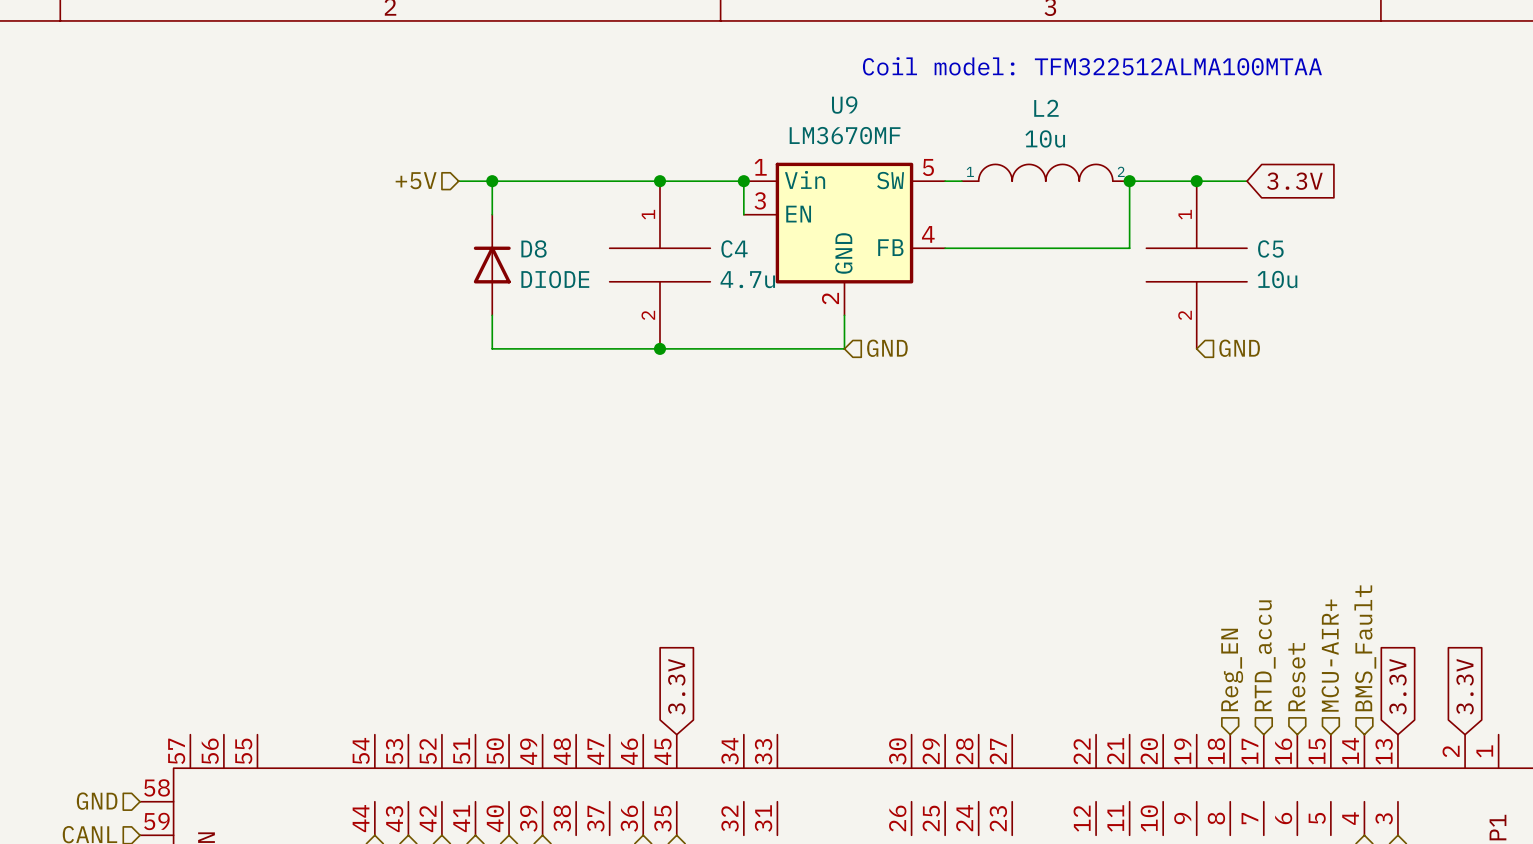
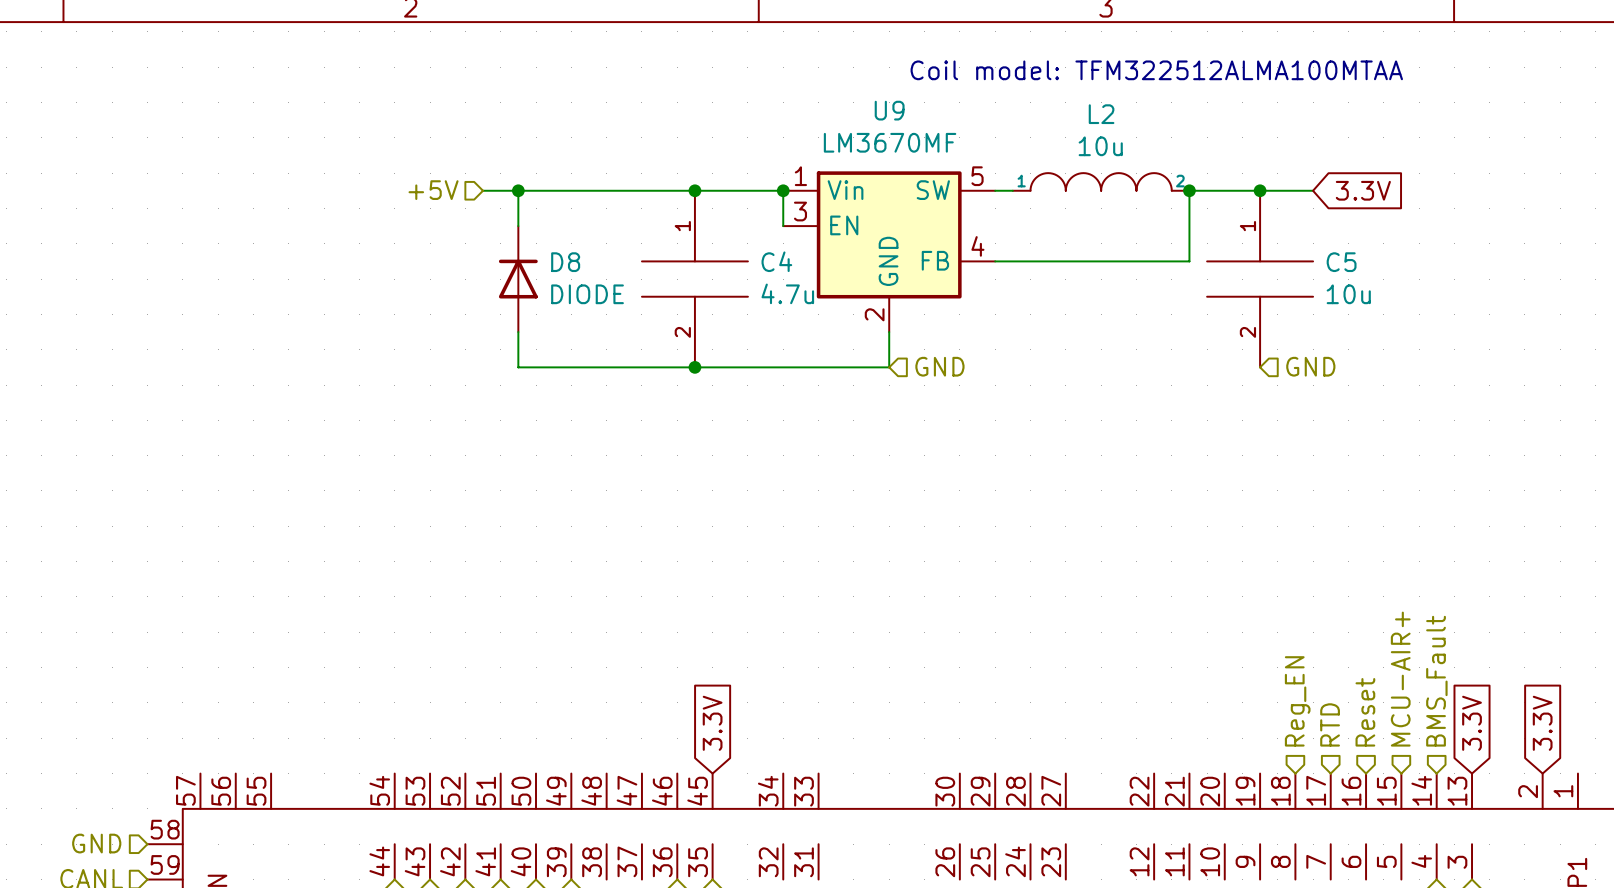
hierarchical label: RTD_accu (1265, 655) -> RTD (1330, 724)

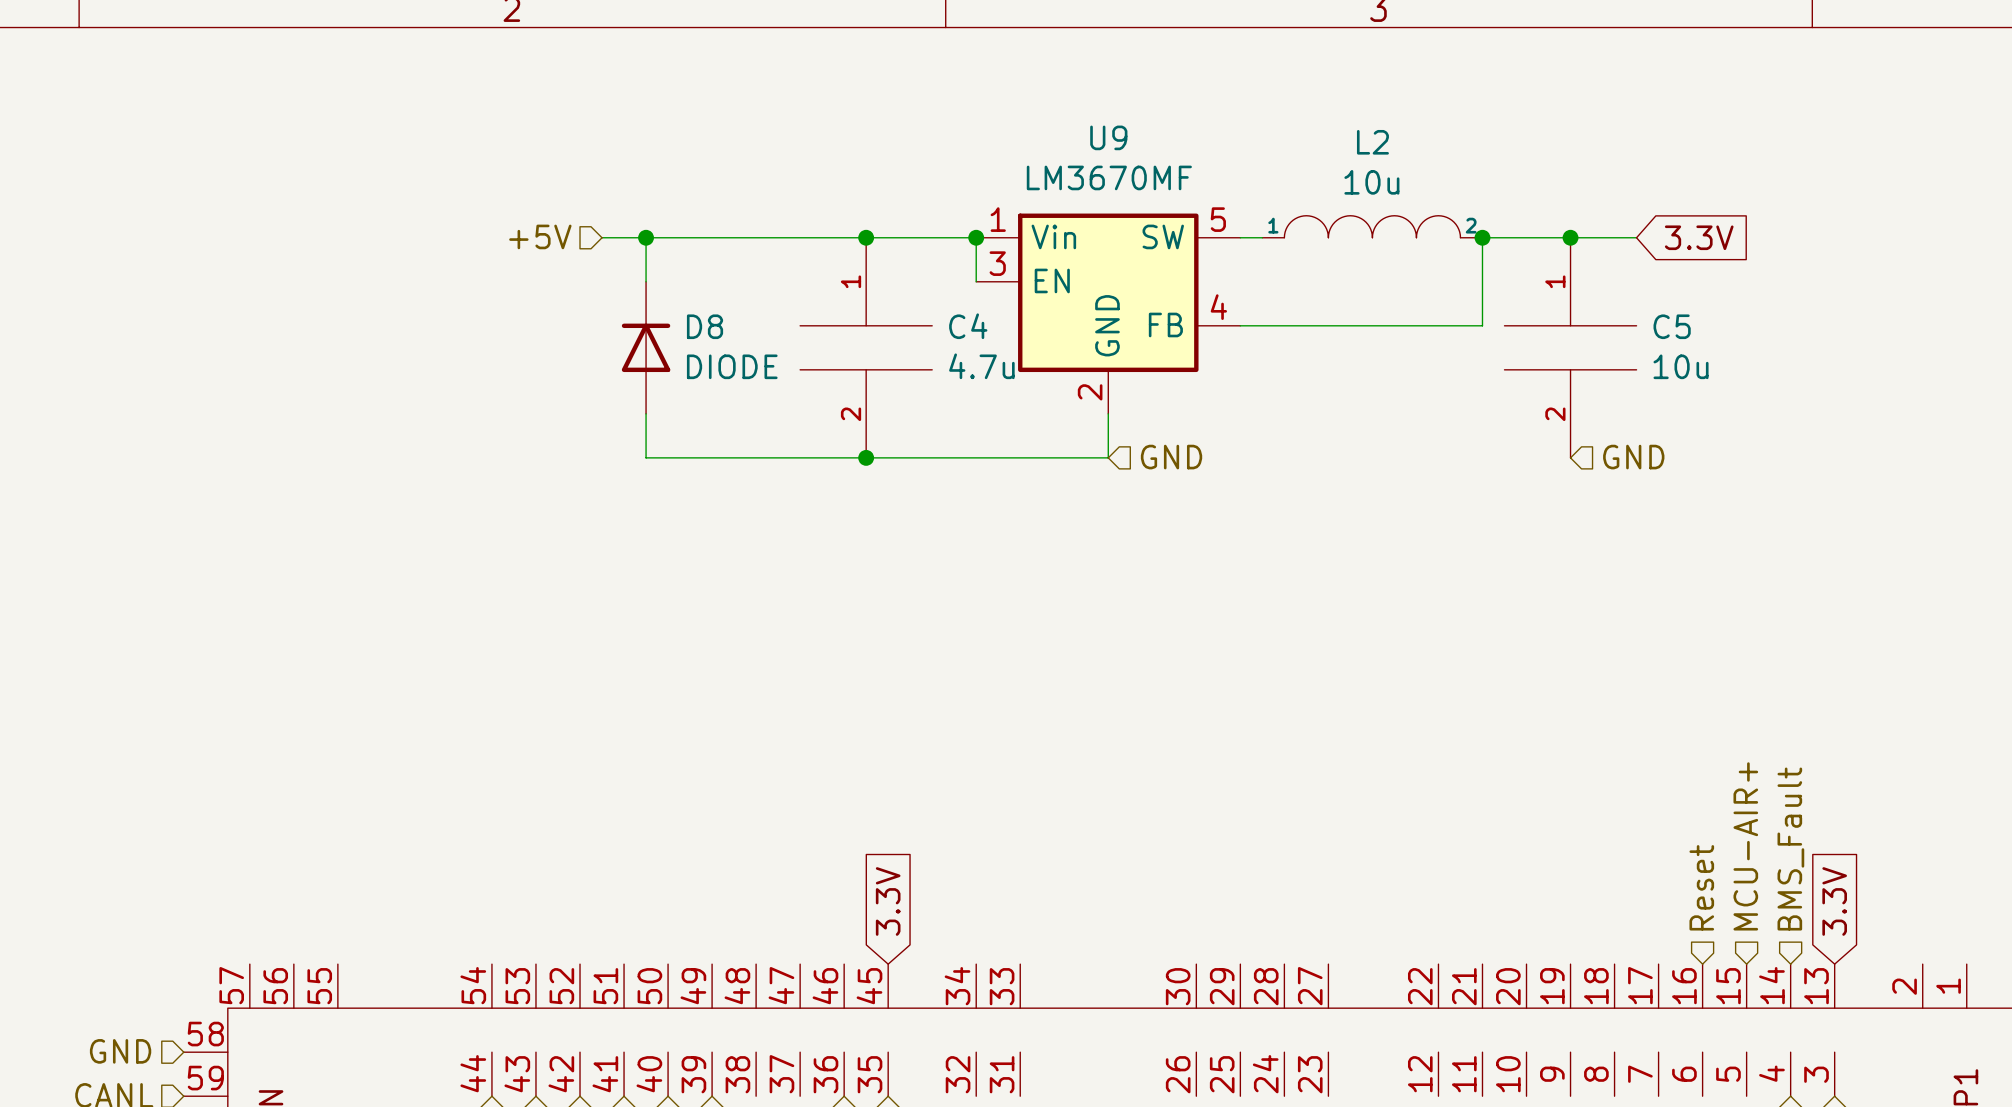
text: Coil model: TFM322512ALMA100MTAA (1156, 70) -> none
hierarchical label: Reg_EN (1297, 701) -> none
global label: 3.3V (1542, 723) -> none
hierarchical label: RTD (1330, 724) -> none

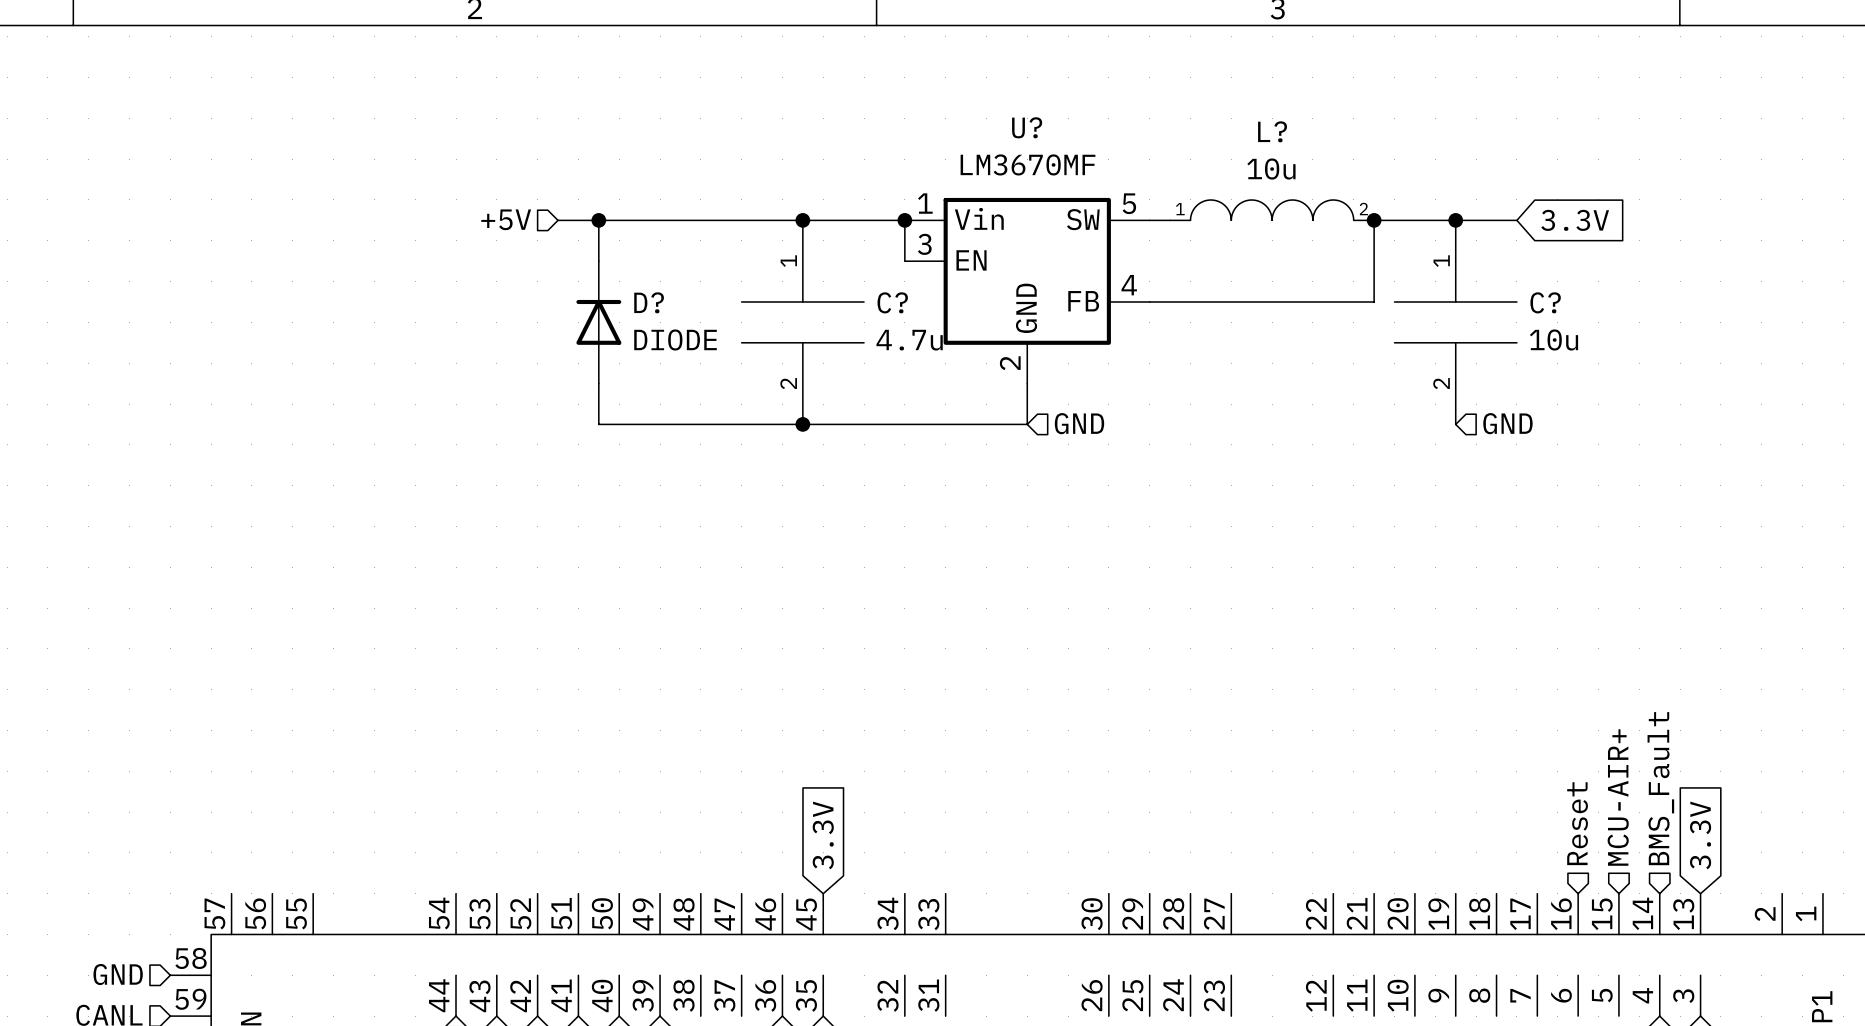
U9 name: U9 (1108, 137) -> U? (1027, 127)
L2 name: L2 (1372, 142) -> L? (1272, 131)
D8 name: D8 (705, 326) -> D? (649, 302)
C4 name: C4 (968, 326) -> C? (892, 302)
C5 name: C5 (1672, 326) -> C? (1545, 302)

